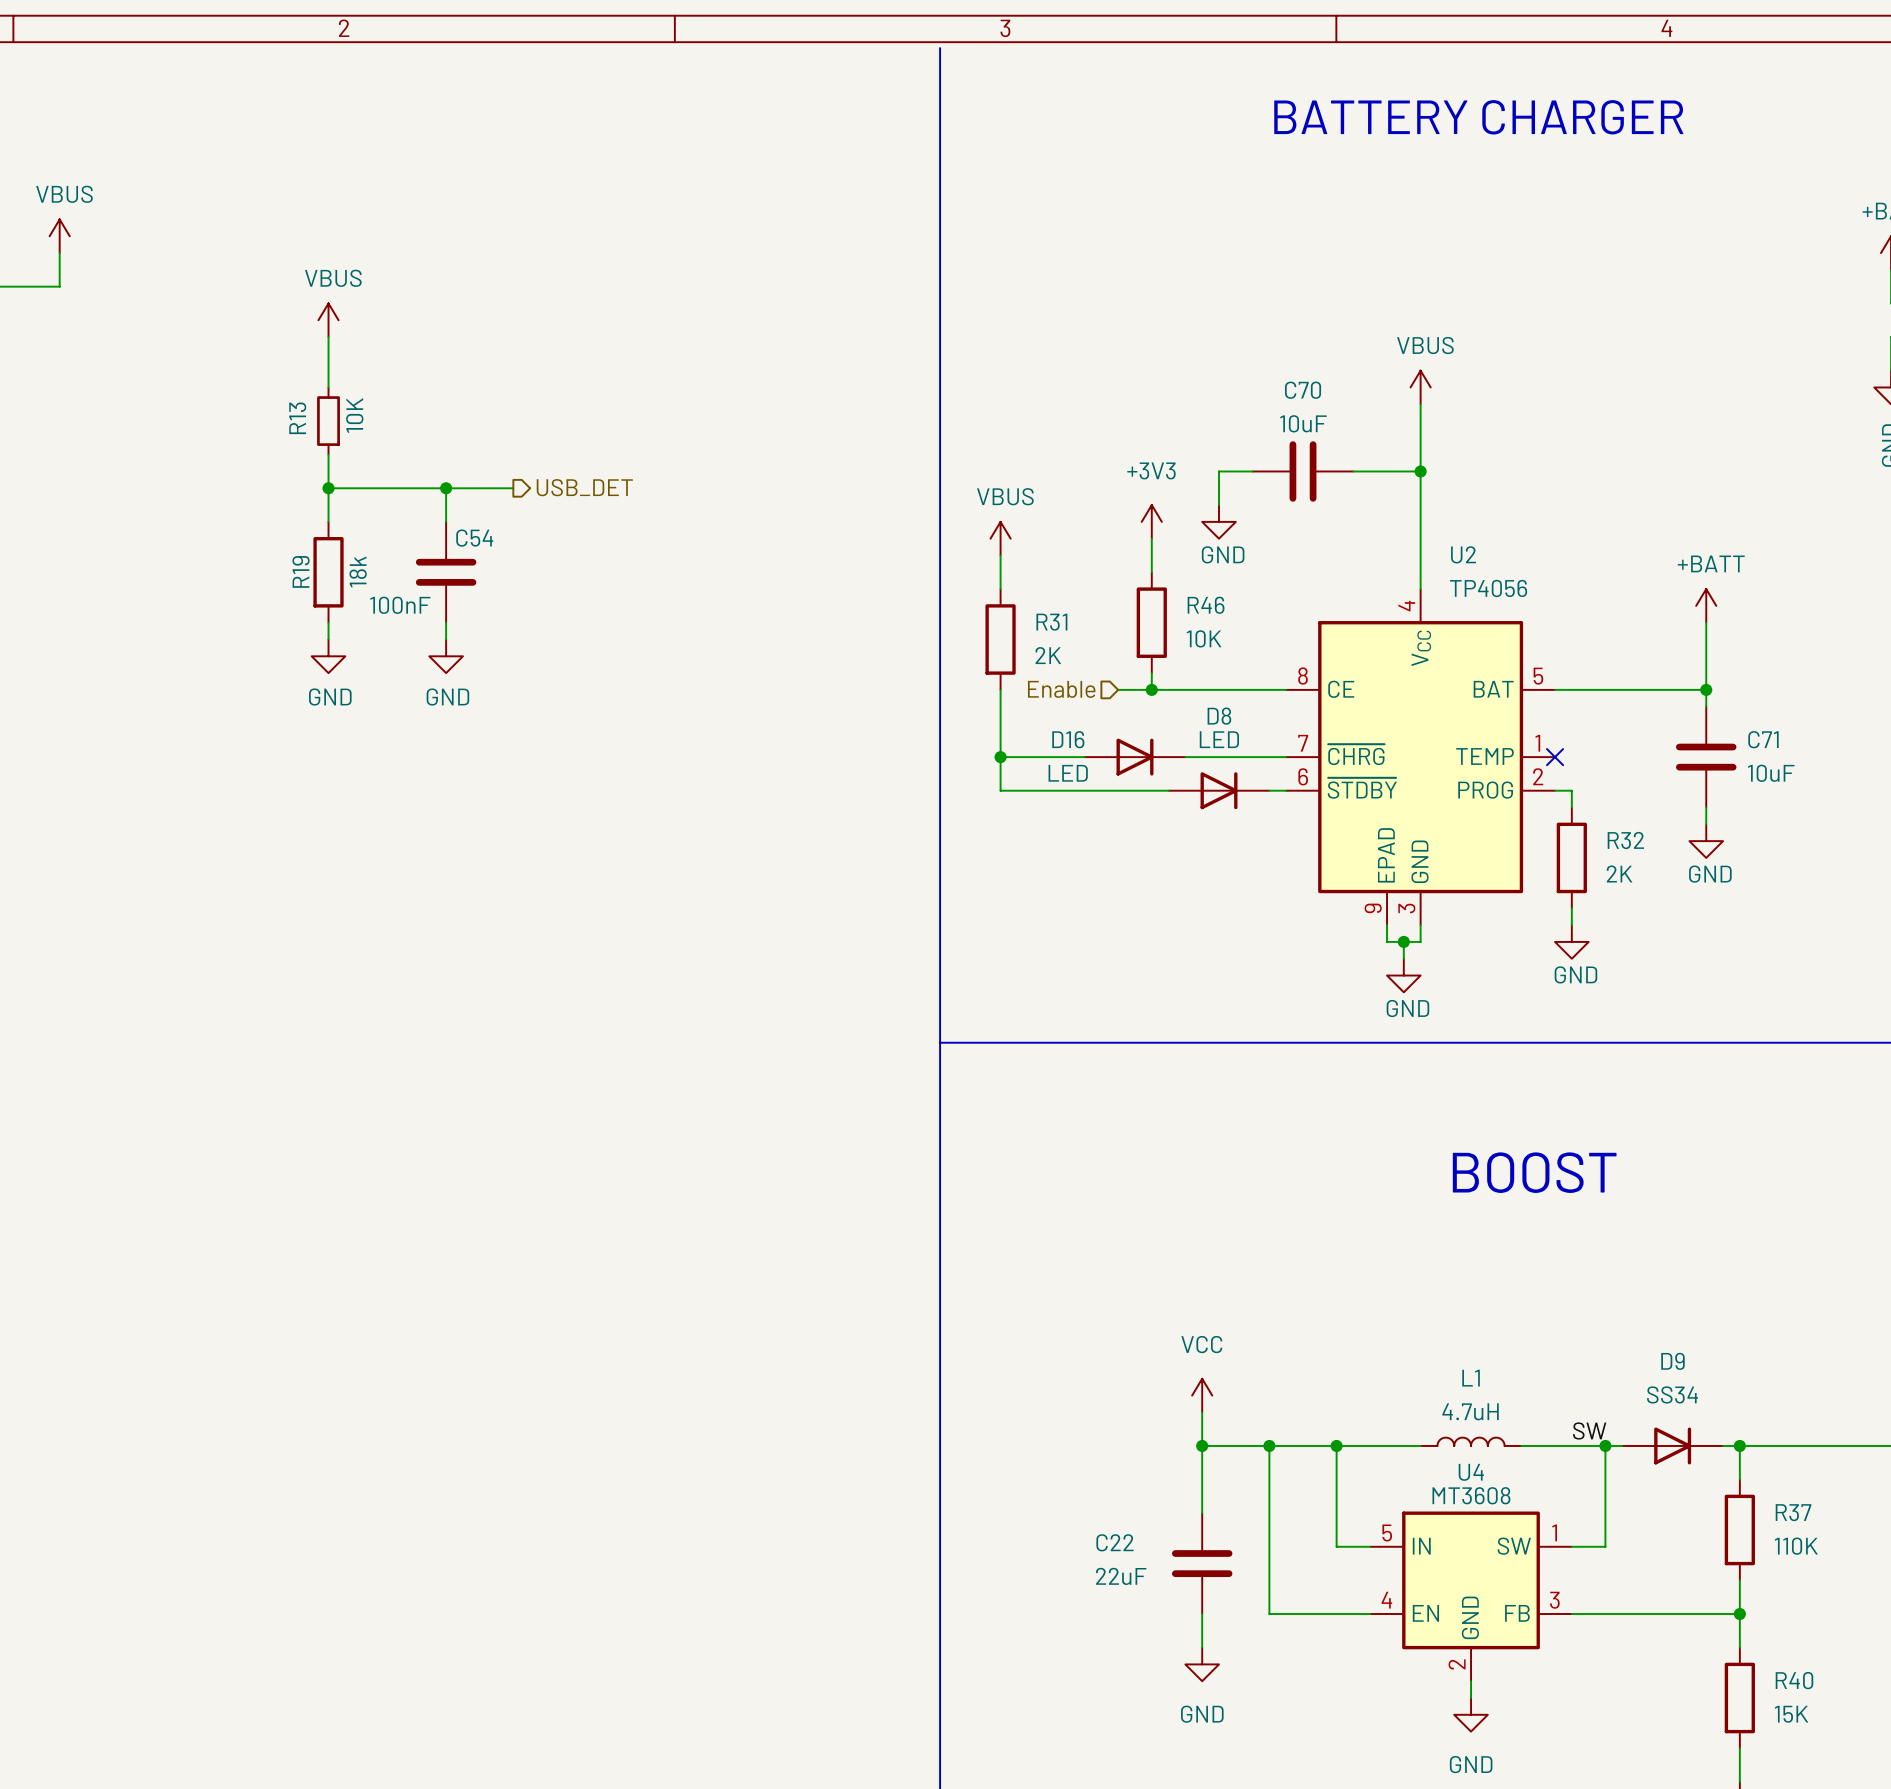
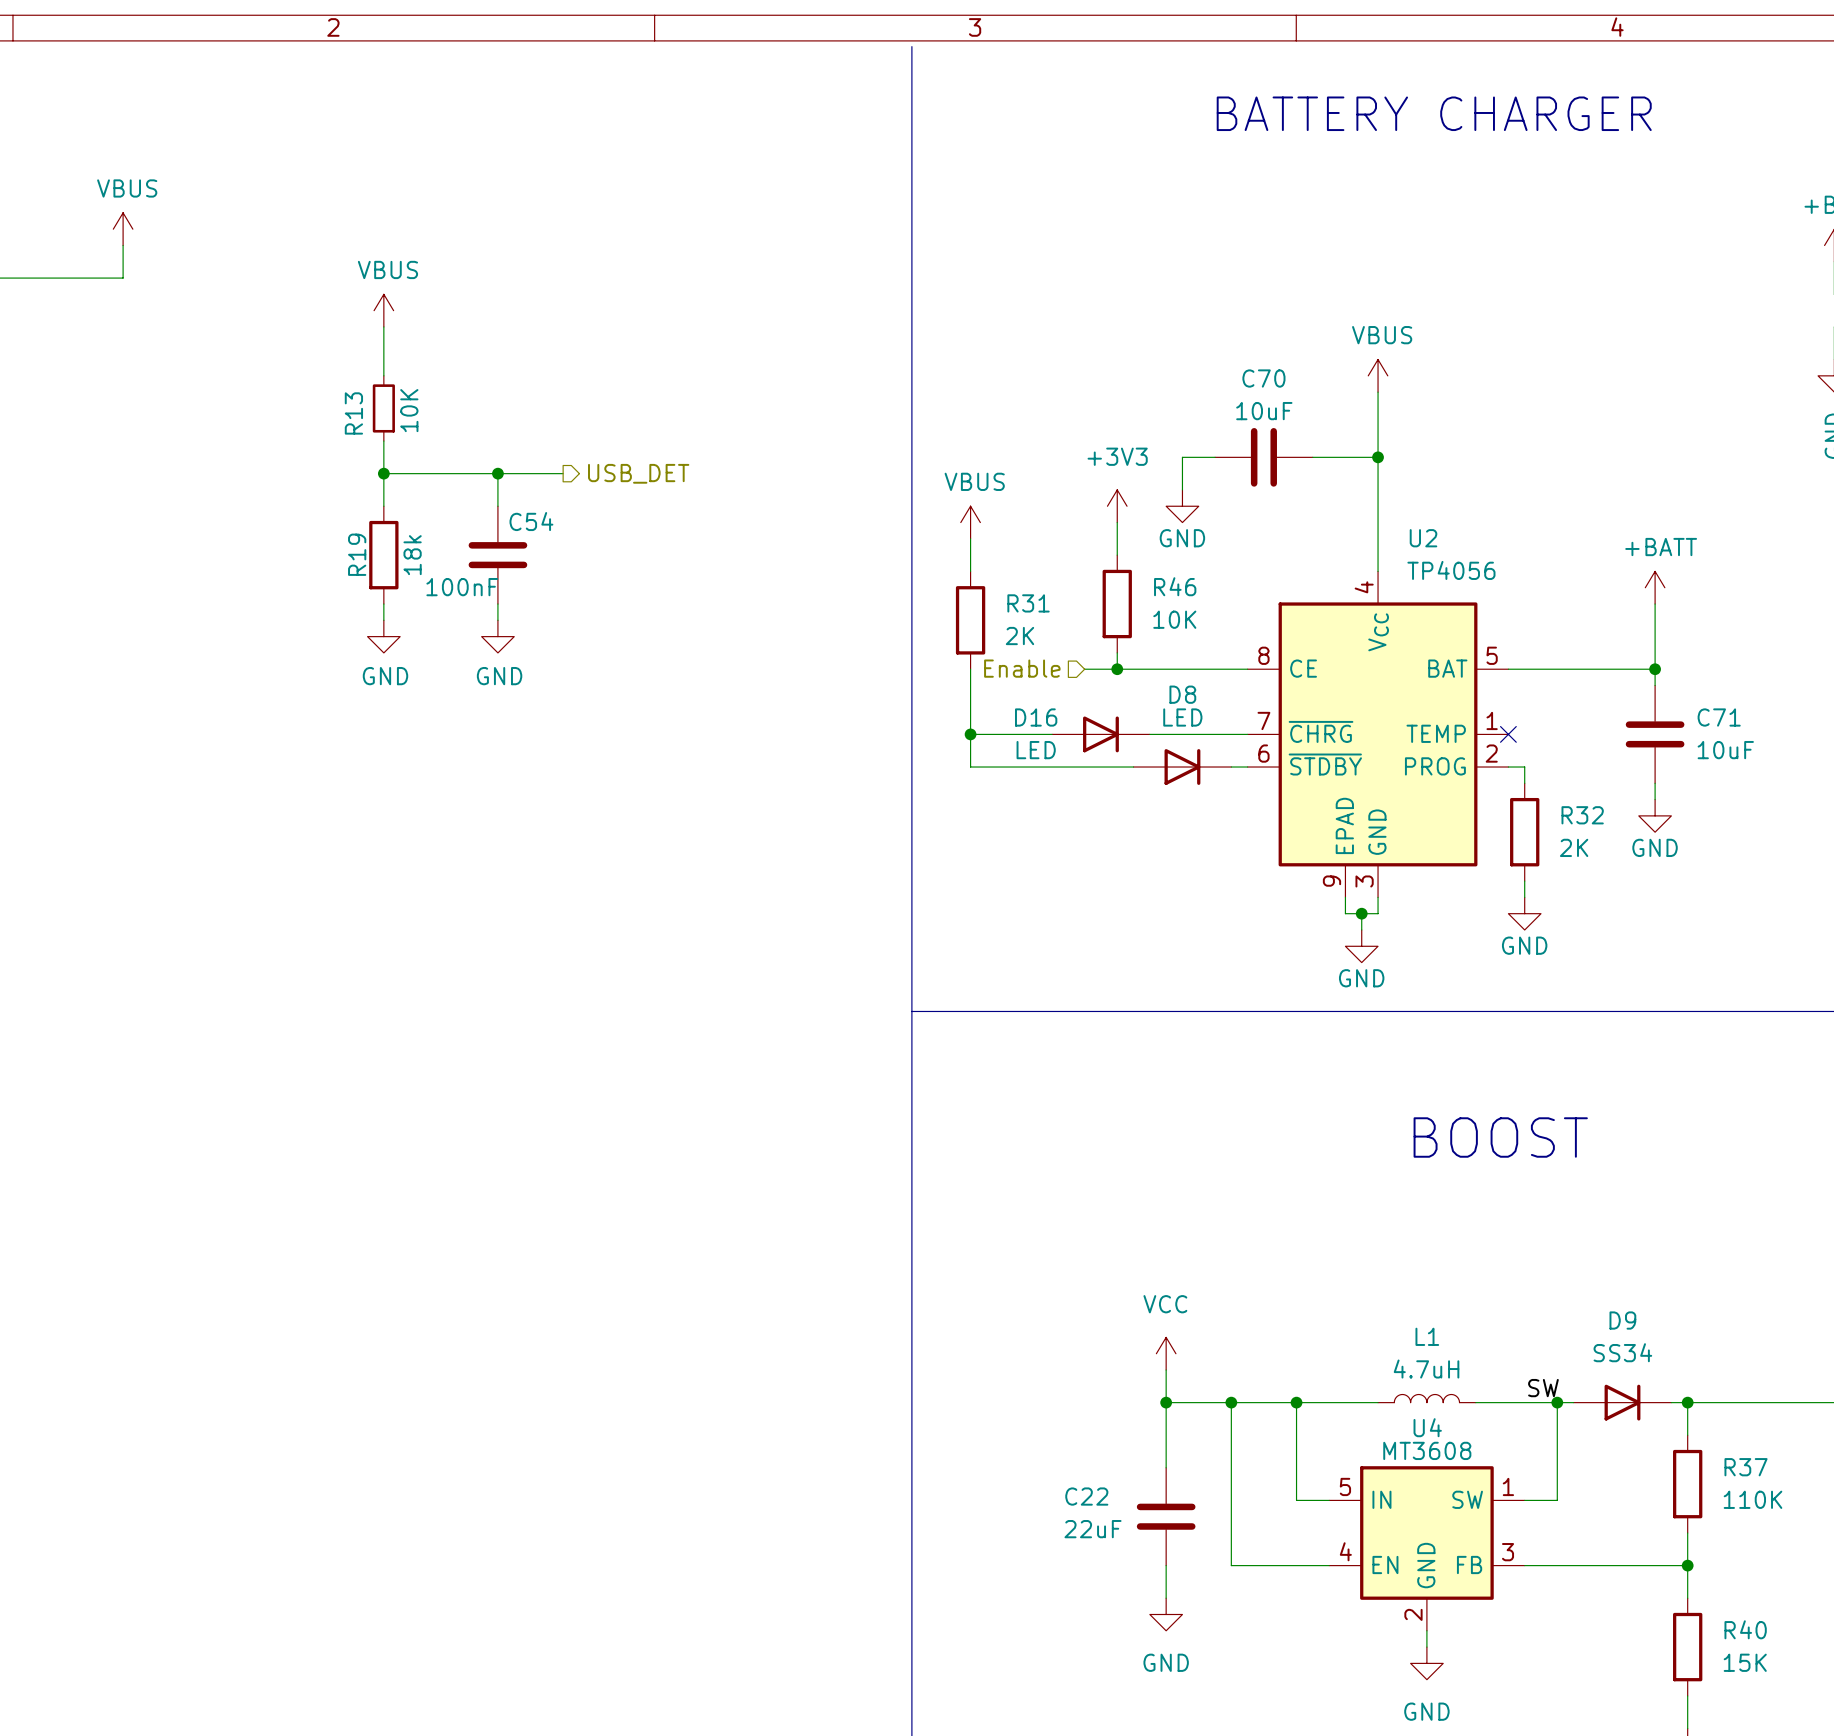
power symbol position: VBUS (59, 236) -> VBUS (123, 229)
wire: (59, 253) (59, 286) -> (123, 245) (123, 278) (57, 278)
power symbol position: VBUS (328, 320) -> VBUS (383, 310)
wire: (328, 337) (328, 387) -> (383, 326) (383, 375)
R13 position: (328, 421) -> (383, 408)
wire: (328, 454) (328, 521) -> (383, 441) (383, 506)
hierarchical label position: USB_DET (584, 487) -> USB_DET (638, 473)
wire: (328, 488) (395, 488) -> none
junction: (328, 488) -> none
junction: none -> (383, 473)
wire: (446, 488) (446, 521) -> none
junction: (446, 488) -> none
junction: none -> (497, 473)
wire: none -> (563, 473) (497, 473) (497, 506)
R19 position: (328, 572) -> (383, 555)
C54 position: (446, 572) -> (497, 555)
wire: (328, 622) (328, 639) -> (383, 604) (383, 620)
wire: (446, 622) (446, 639) -> (497, 604) (497, 620)
power symbol: GND (328, 656) -> none
power symbol: none -> GND (383, 636)
power symbol: GND (446, 656) -> none
power symbol: none -> GND (497, 636)

